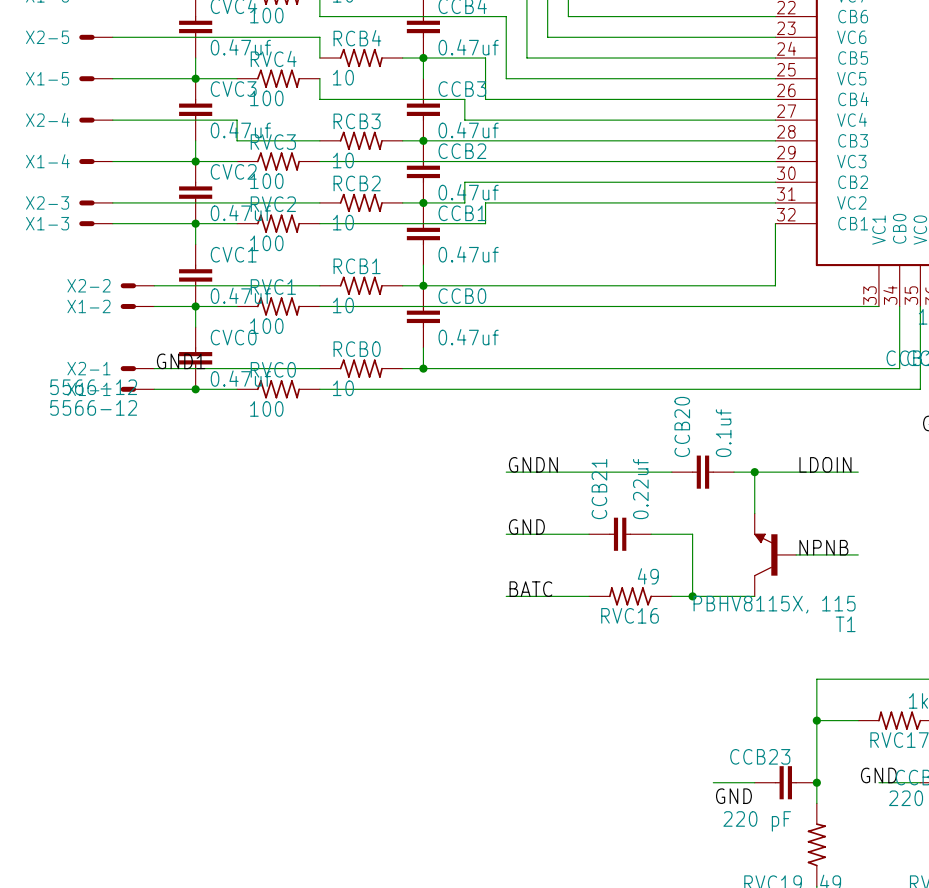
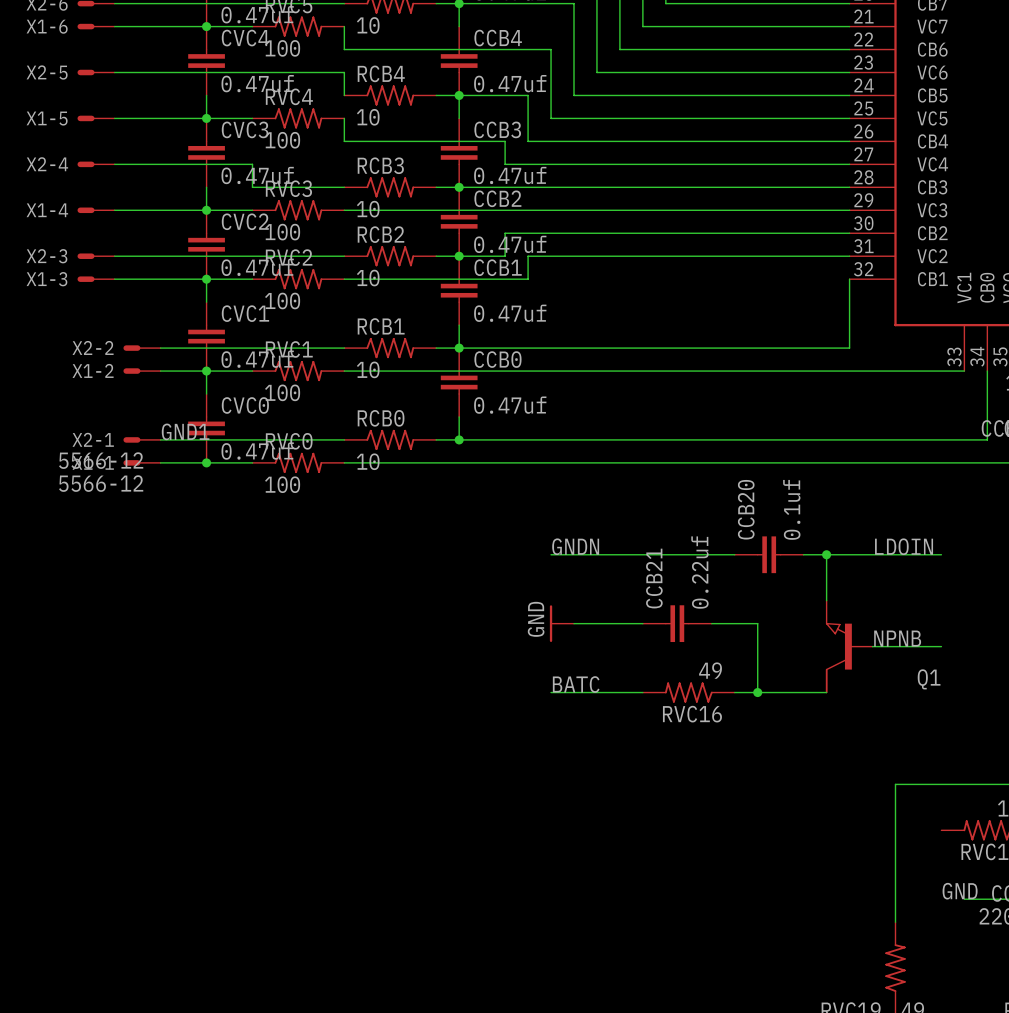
label: GND (526, 527) -> none
power symbol: none -> GND (561, 623)
T1: PBHV8115X, 115 (775, 554) -> none
Q1: none -> (849, 646)
wire: (816, 720) (858, 720) -> none
junction: (816, 720) -> none
wire: (713, 782) (754, 782) -> none
CCB23: 220 pF (785, 782) -> none
junction: (816, 782) -> none
label: GND (733, 796) -> none

